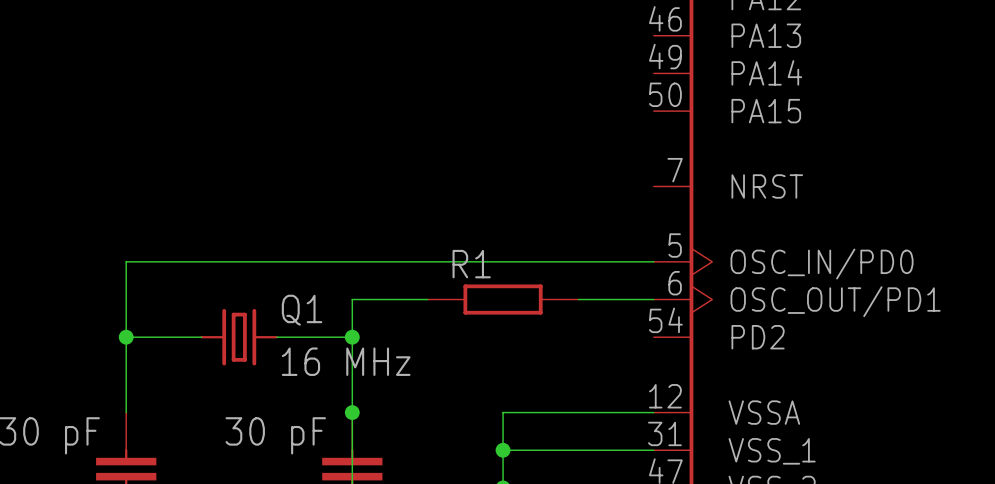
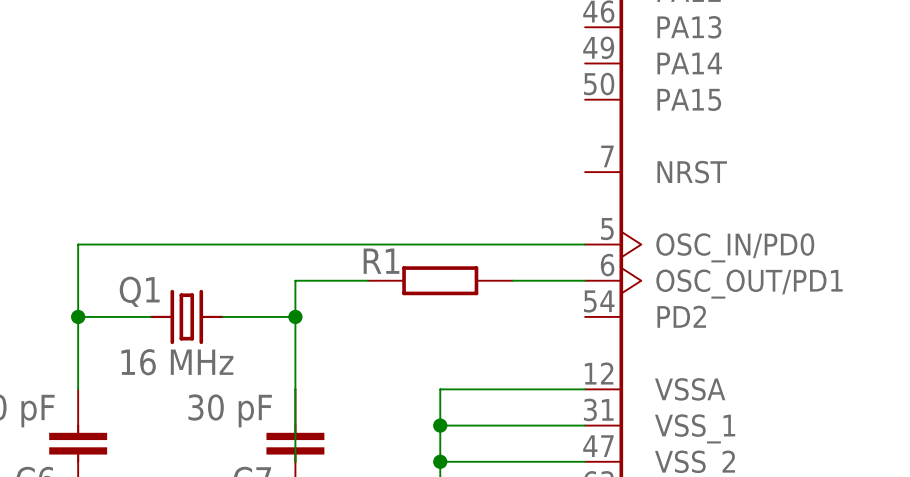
R1 name position: R1 (471, 264) -> R1 (381, 261)
Q1 name position: Q1 (302, 310) -> Q1 (139, 291)
Q1 value position: 16 MHz (346, 361) -> 16 MHz (177, 362)
junction: (352, 412) -> none

